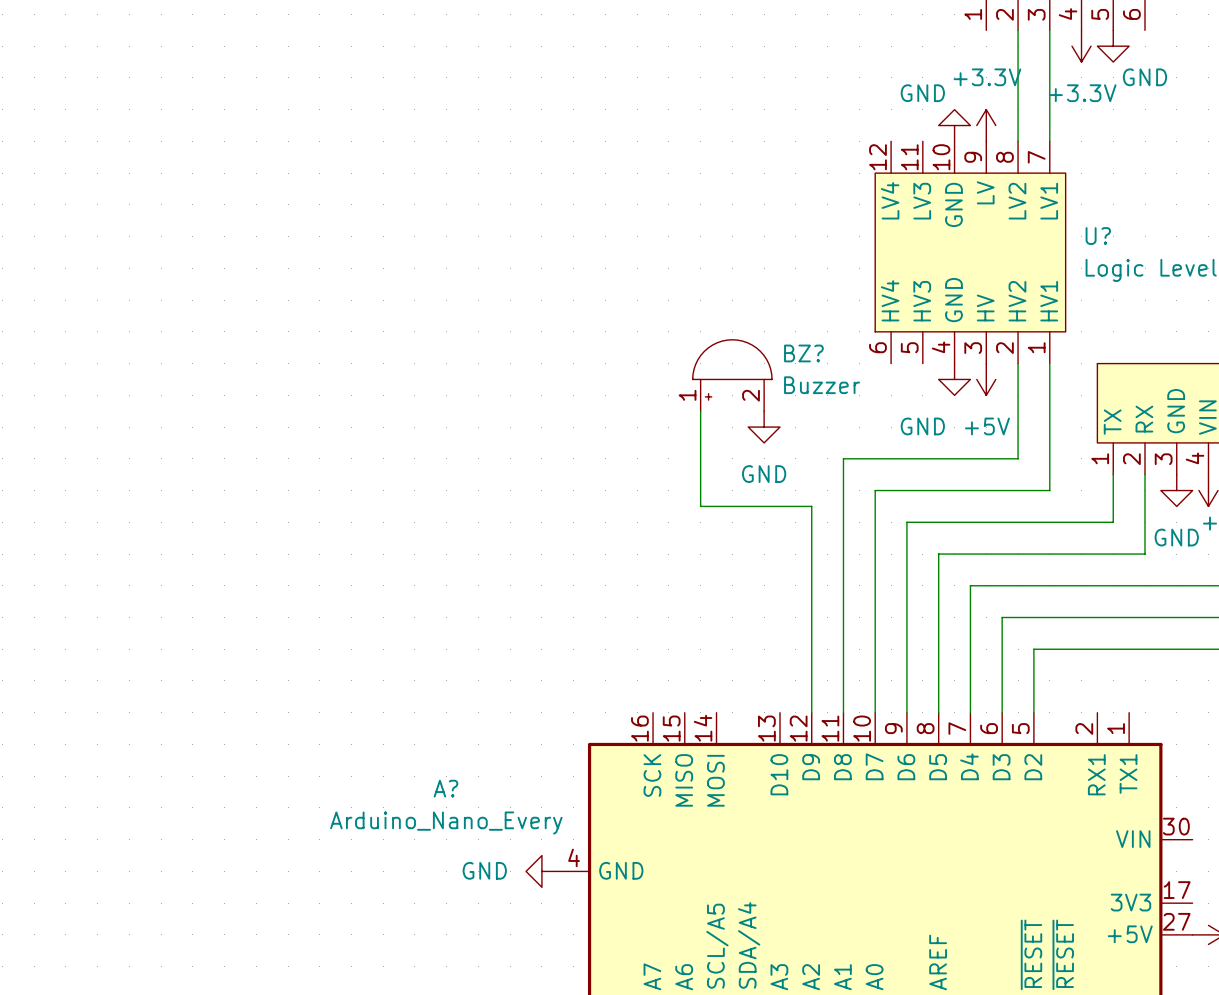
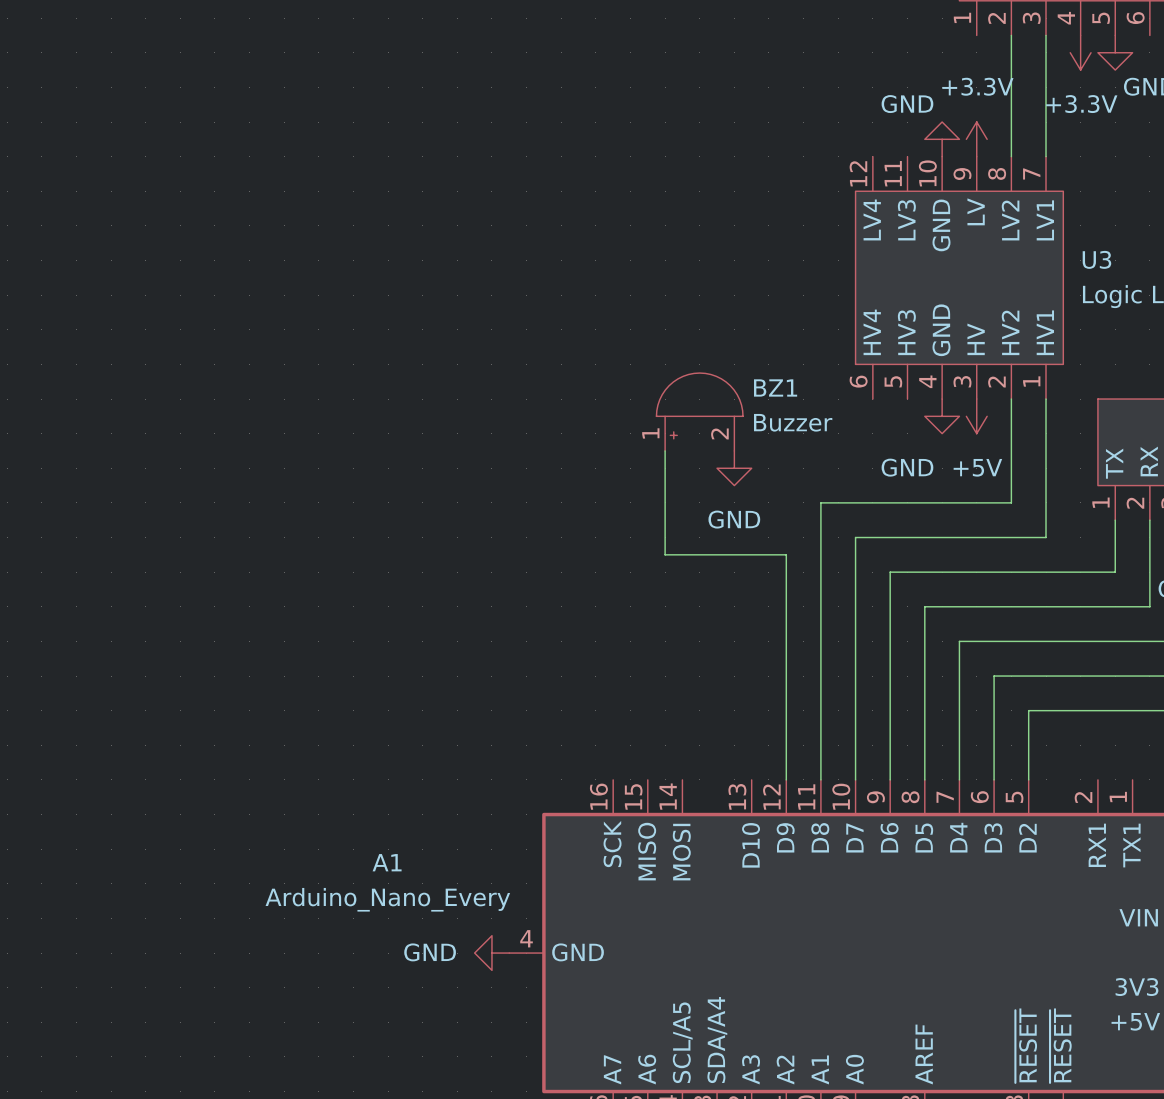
U? name: U? (1098, 236) -> U3 (1096, 259)
BZ? name: BZ? (803, 353) -> BZ1 (775, 387)
A? name: A? (445, 788) -> A1 (387, 862)

